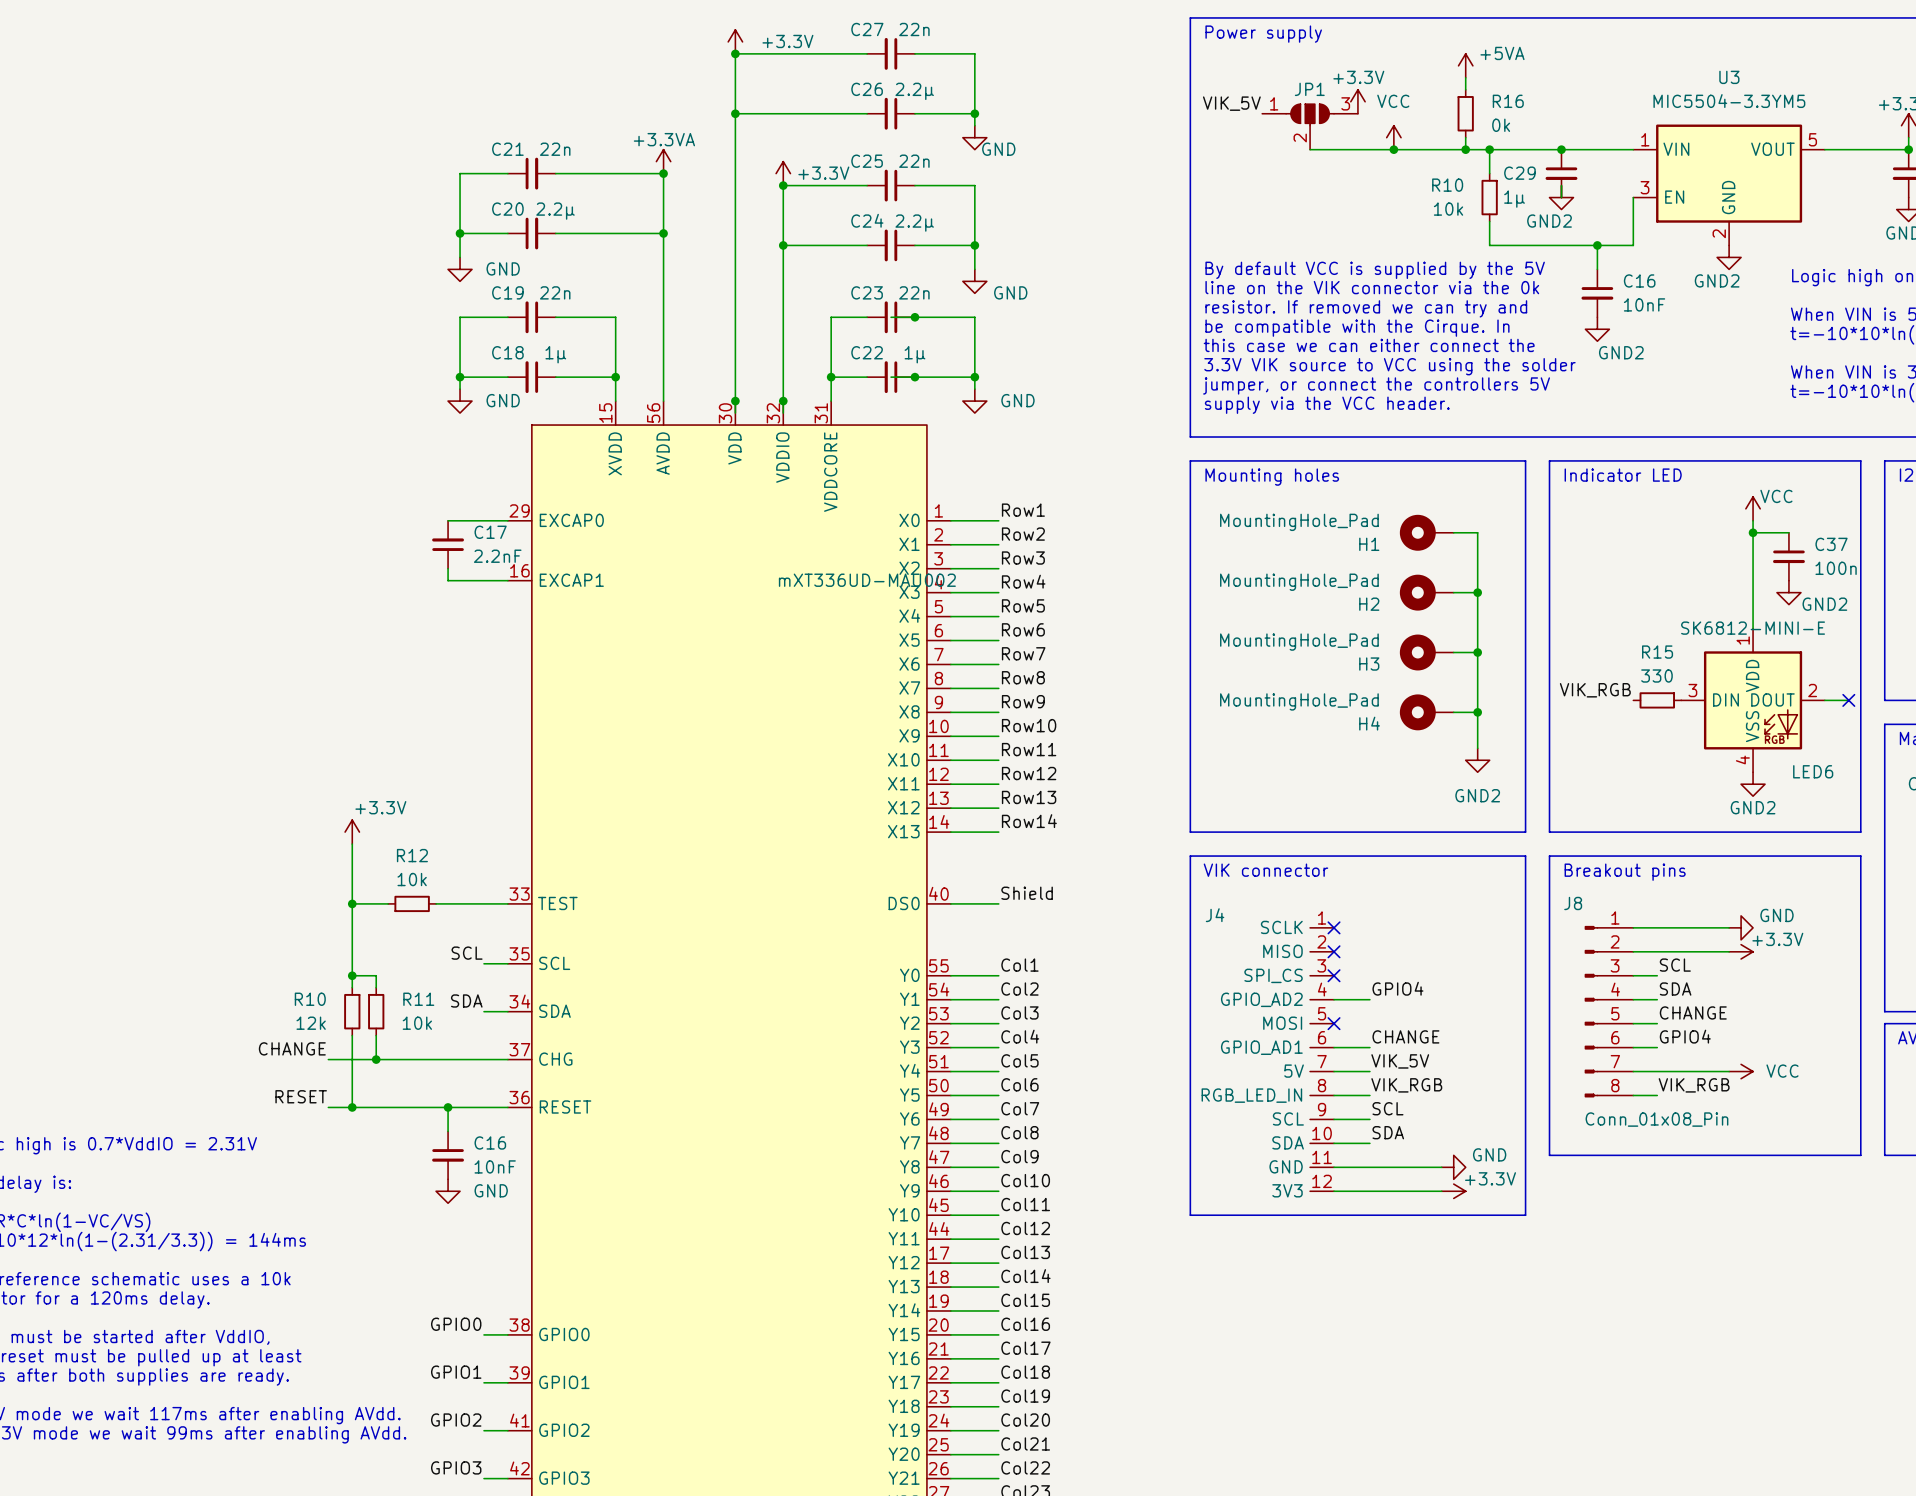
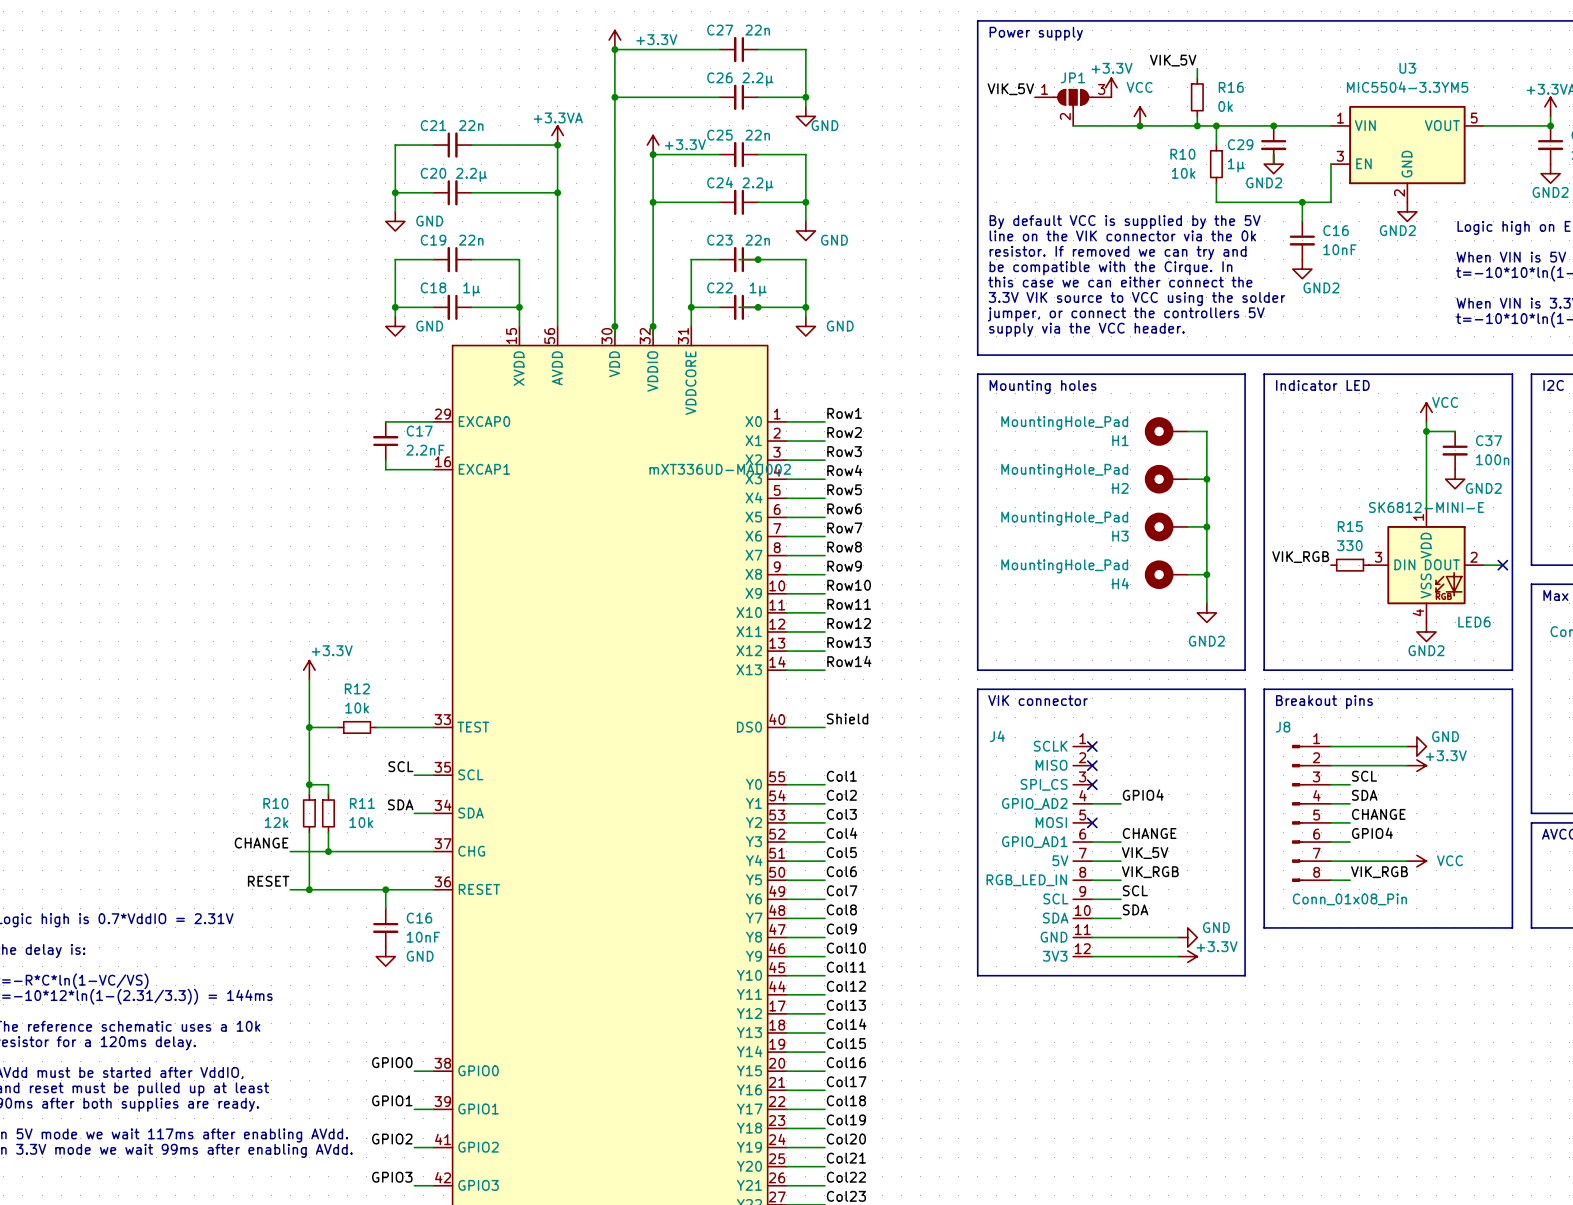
power symbol: +5VA (1465, 65) -> none
label: none -> VIK_5V (1173, 60)

